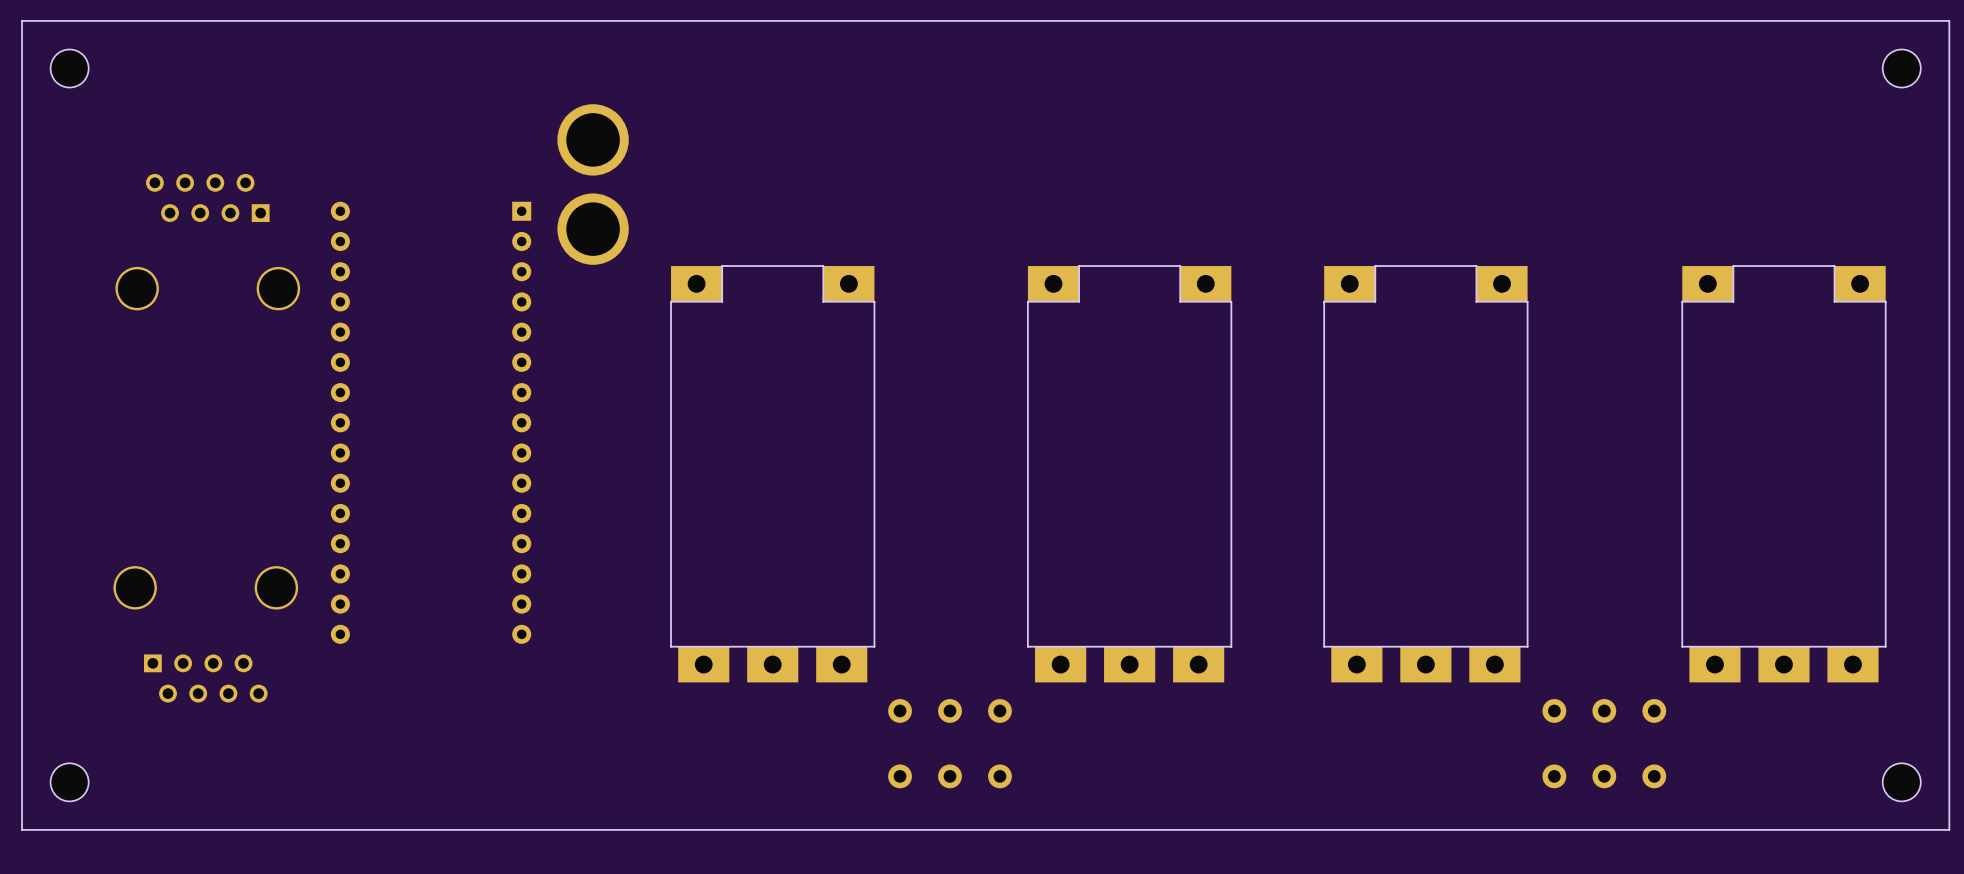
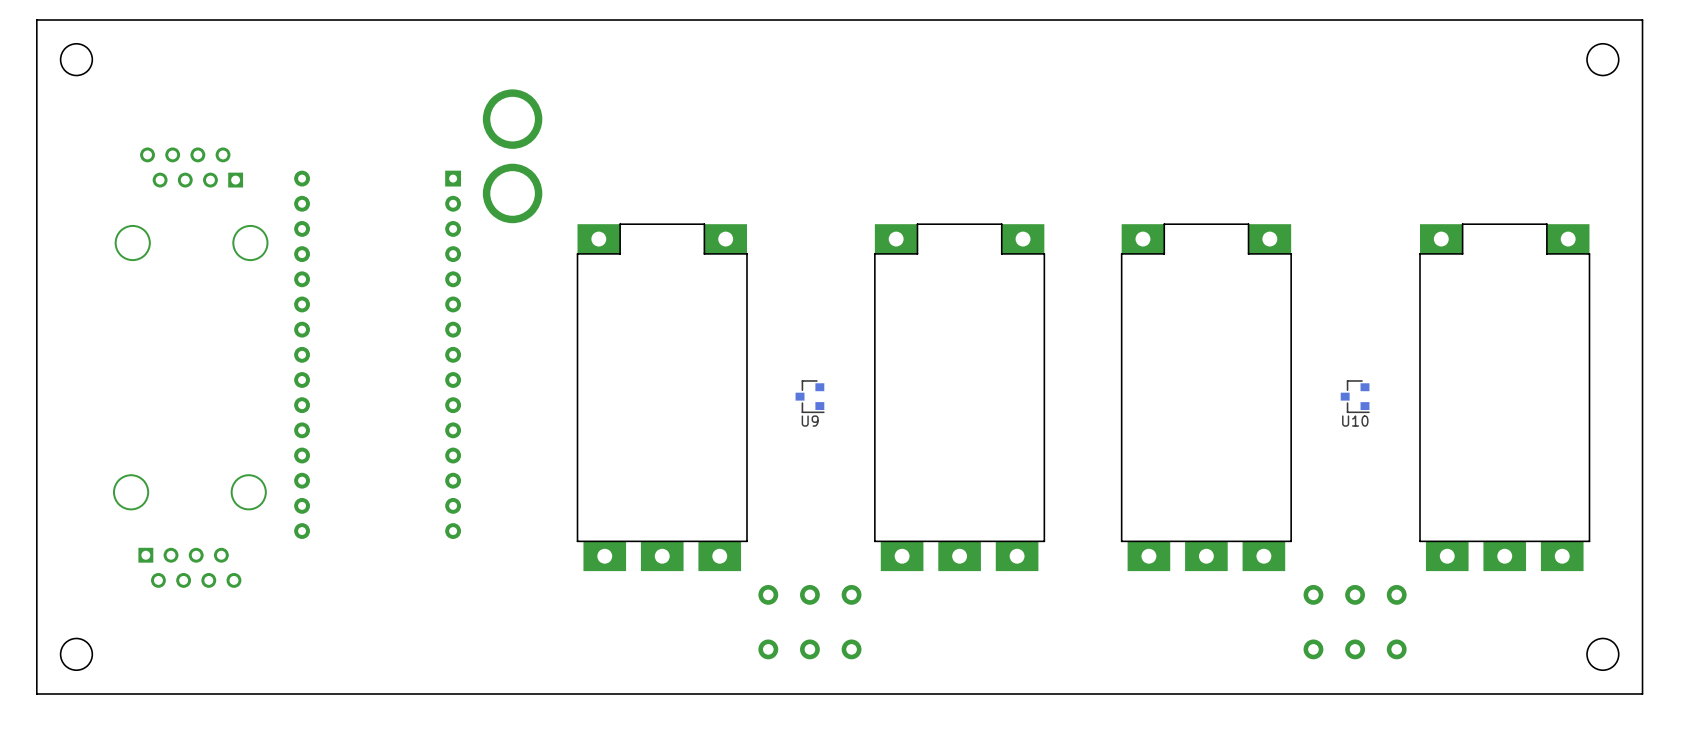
U9: none -> (809, 396)
U10: none -> (1355, 396)

